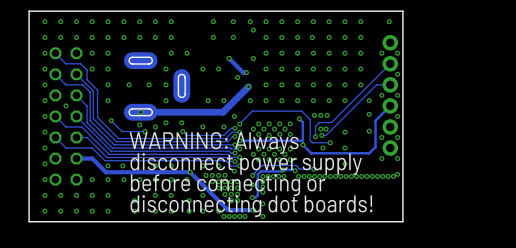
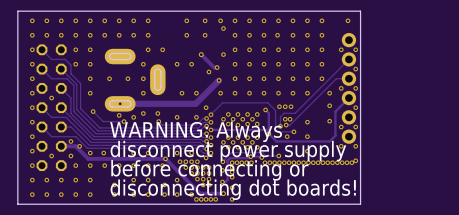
via: none -> (70, 141)
via: none -> (79, 146)
via: none -> (51, 155)
via: none -> (70, 155)

